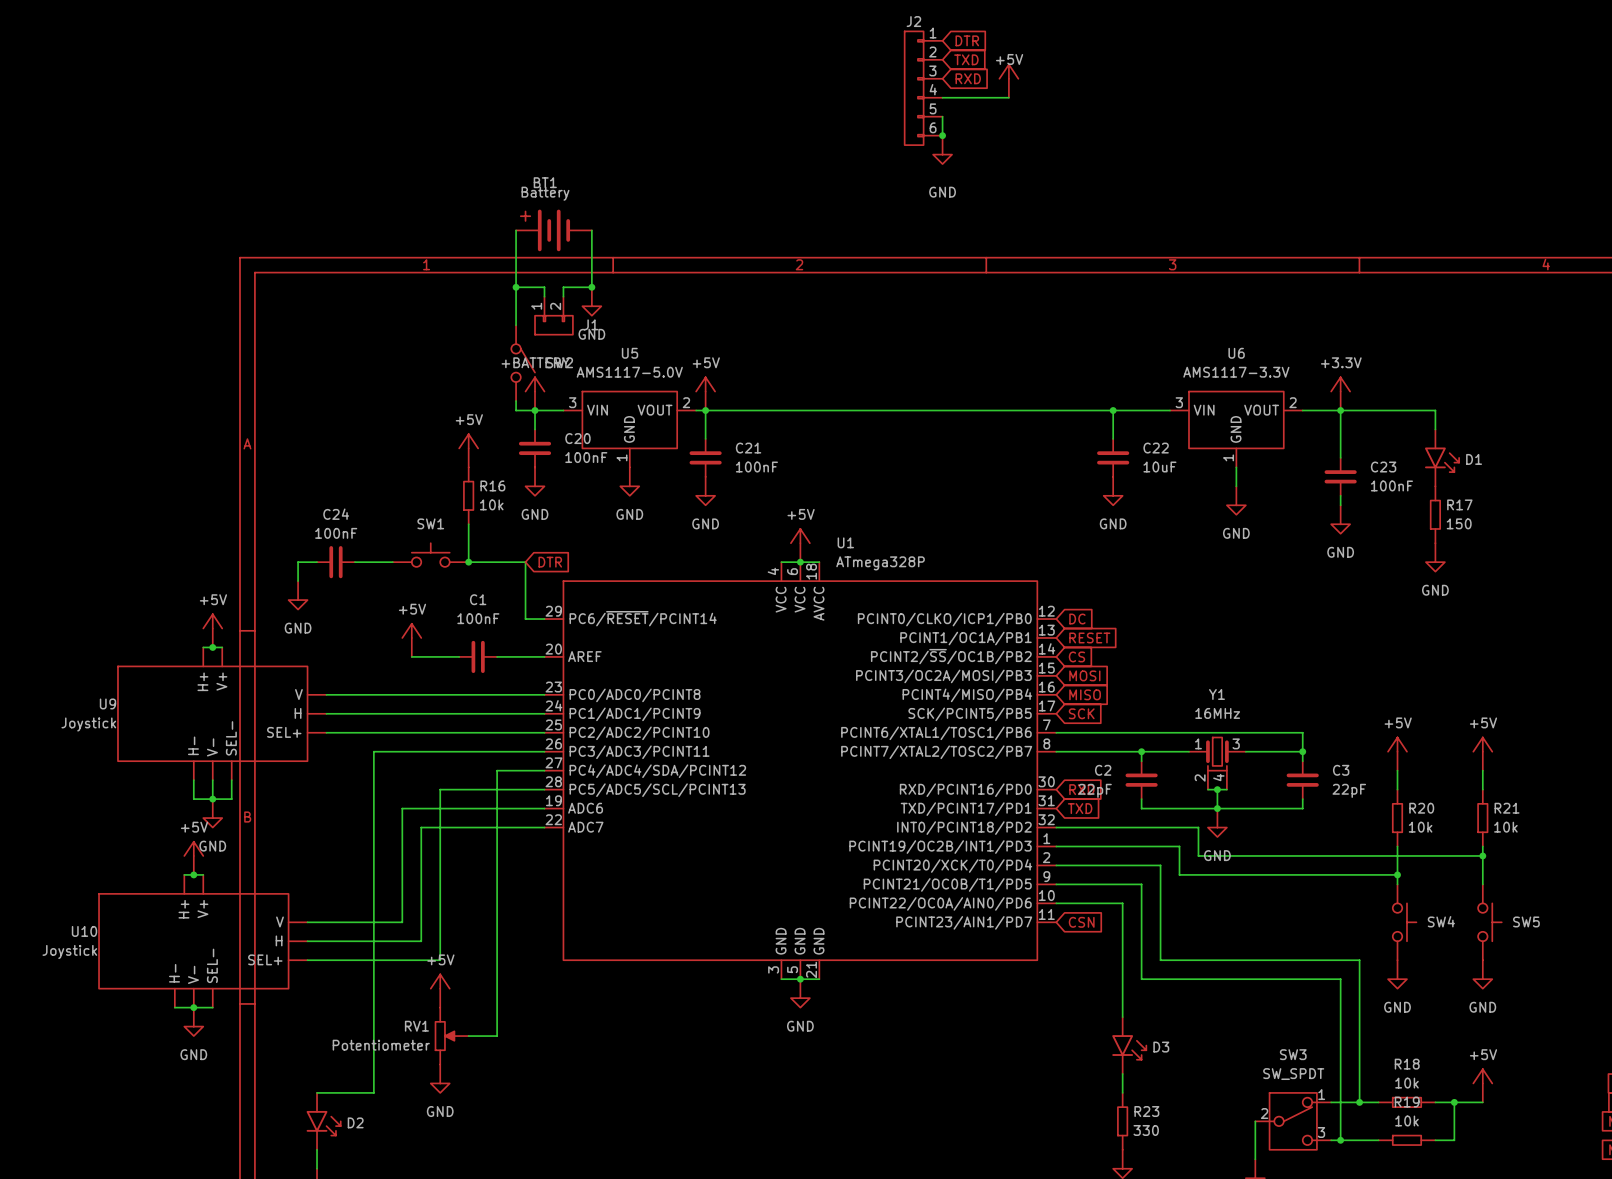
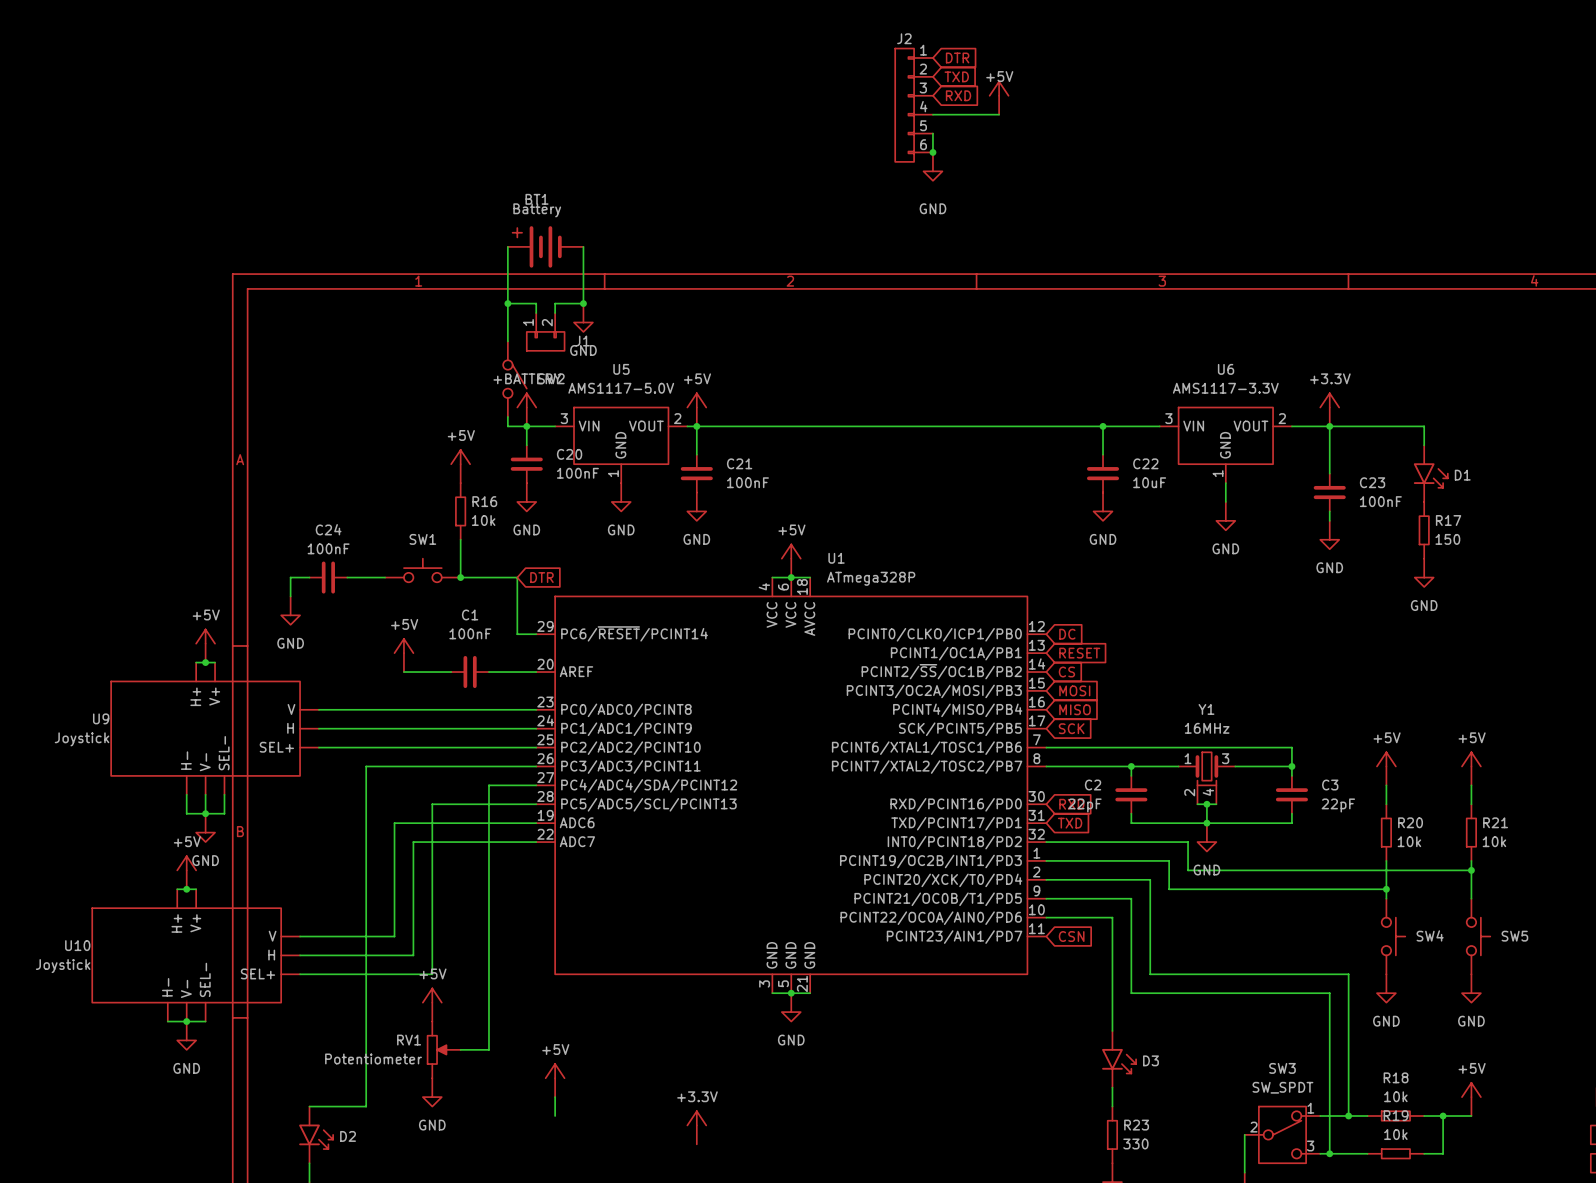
power symbol: none -> +5V (555, 1080)
wire: none -> (555, 1097) (555, 1116)
power symbol: none -> +3.3V (696, 1127)

